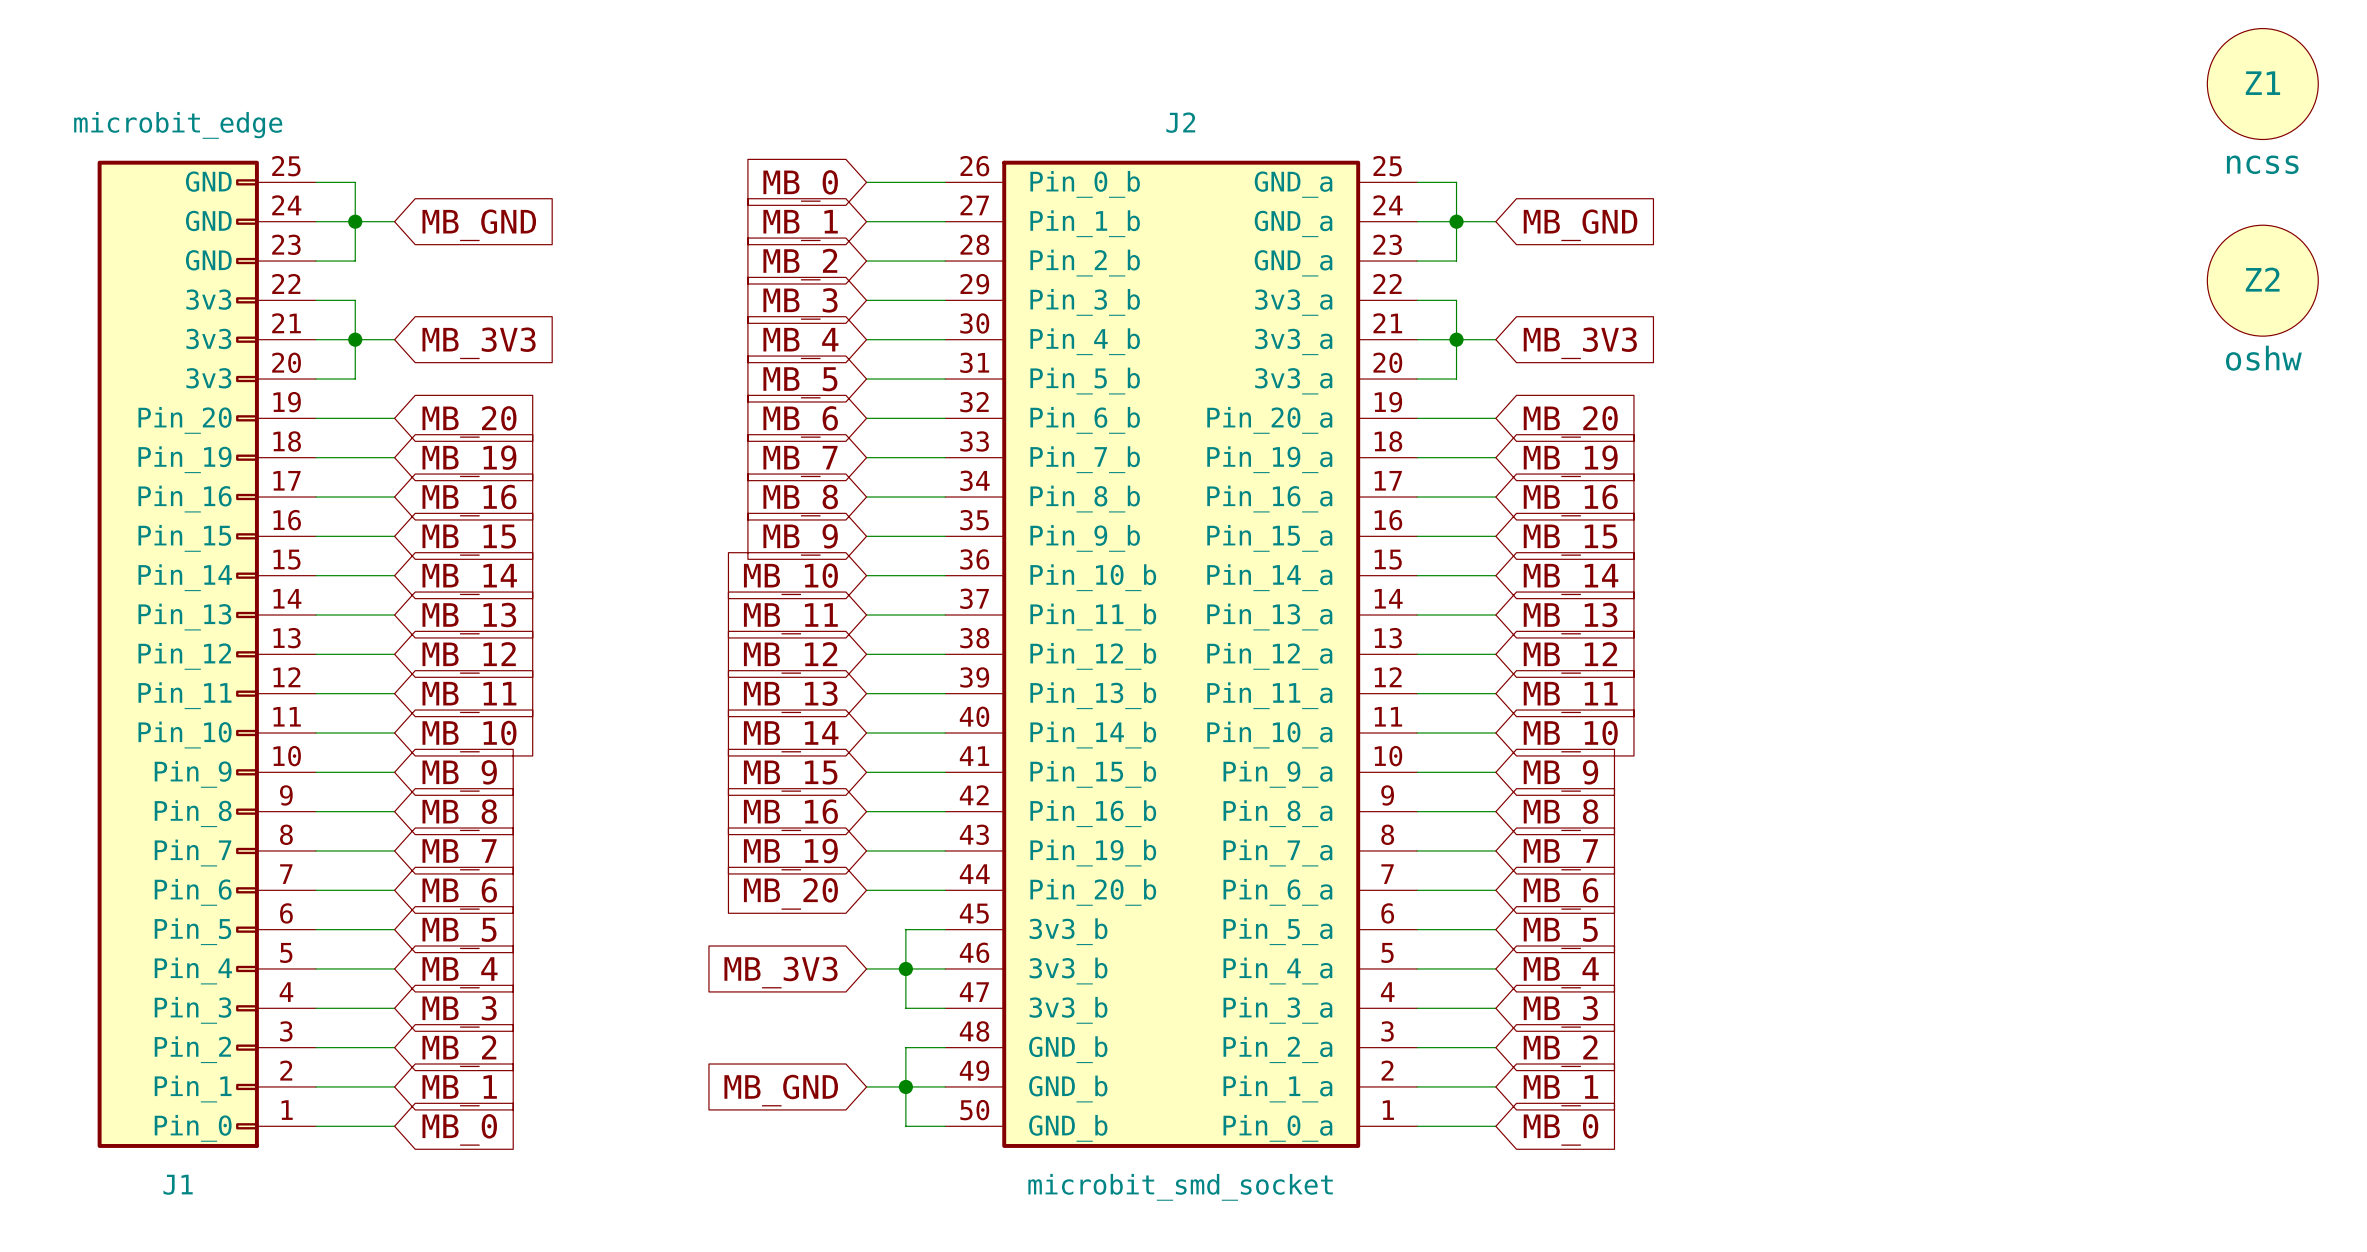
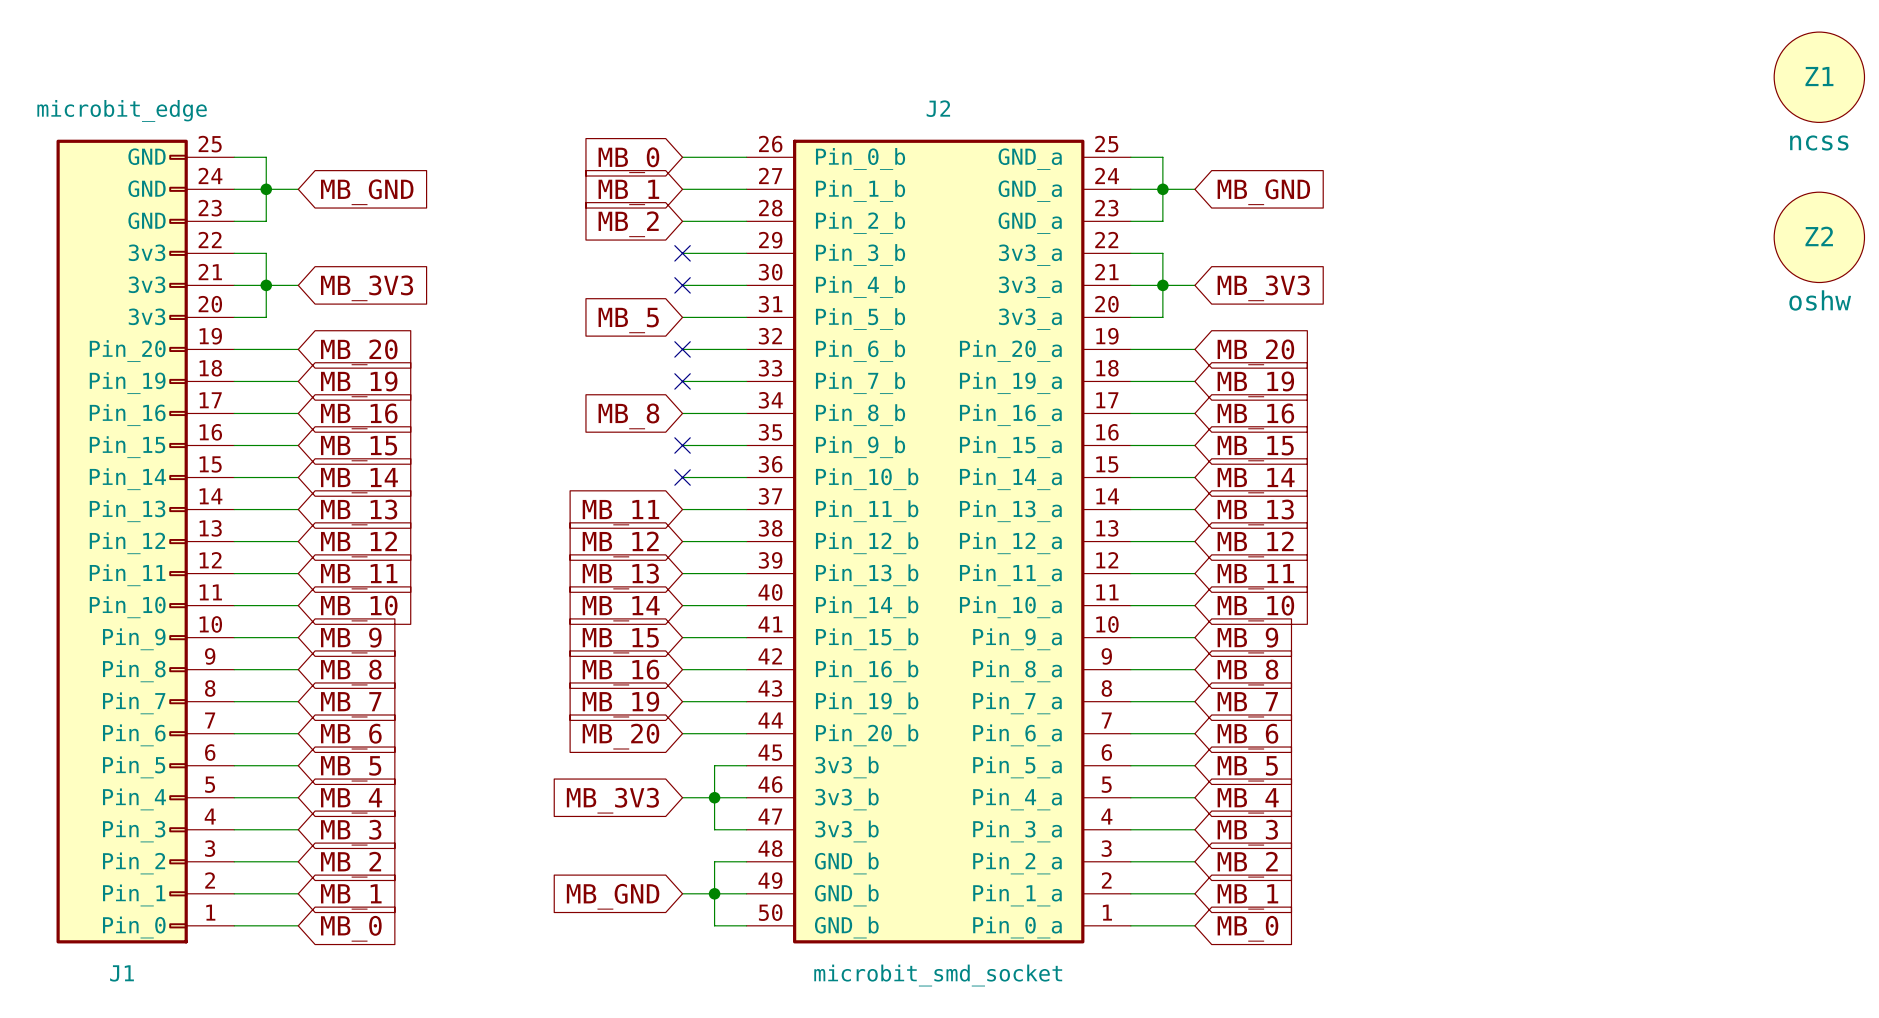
no-connect mark: none -> (682, 253)
global label: MB_3 (800, 303) -> none
no-connect mark: none -> (682, 285)
global label: MB_4 (800, 343) -> none
no-connect mark: none -> (682, 349)
global label: MB_6 (800, 421) -> none
no-connect mark: none -> (682, 381)
global label: MB_7 (800, 461) -> none
no-connect mark: none -> (682, 445)
global label: MB_9 (800, 539) -> none
no-connect mark: none -> (682, 477)
global label: MB_10 (790, 579) -> none

